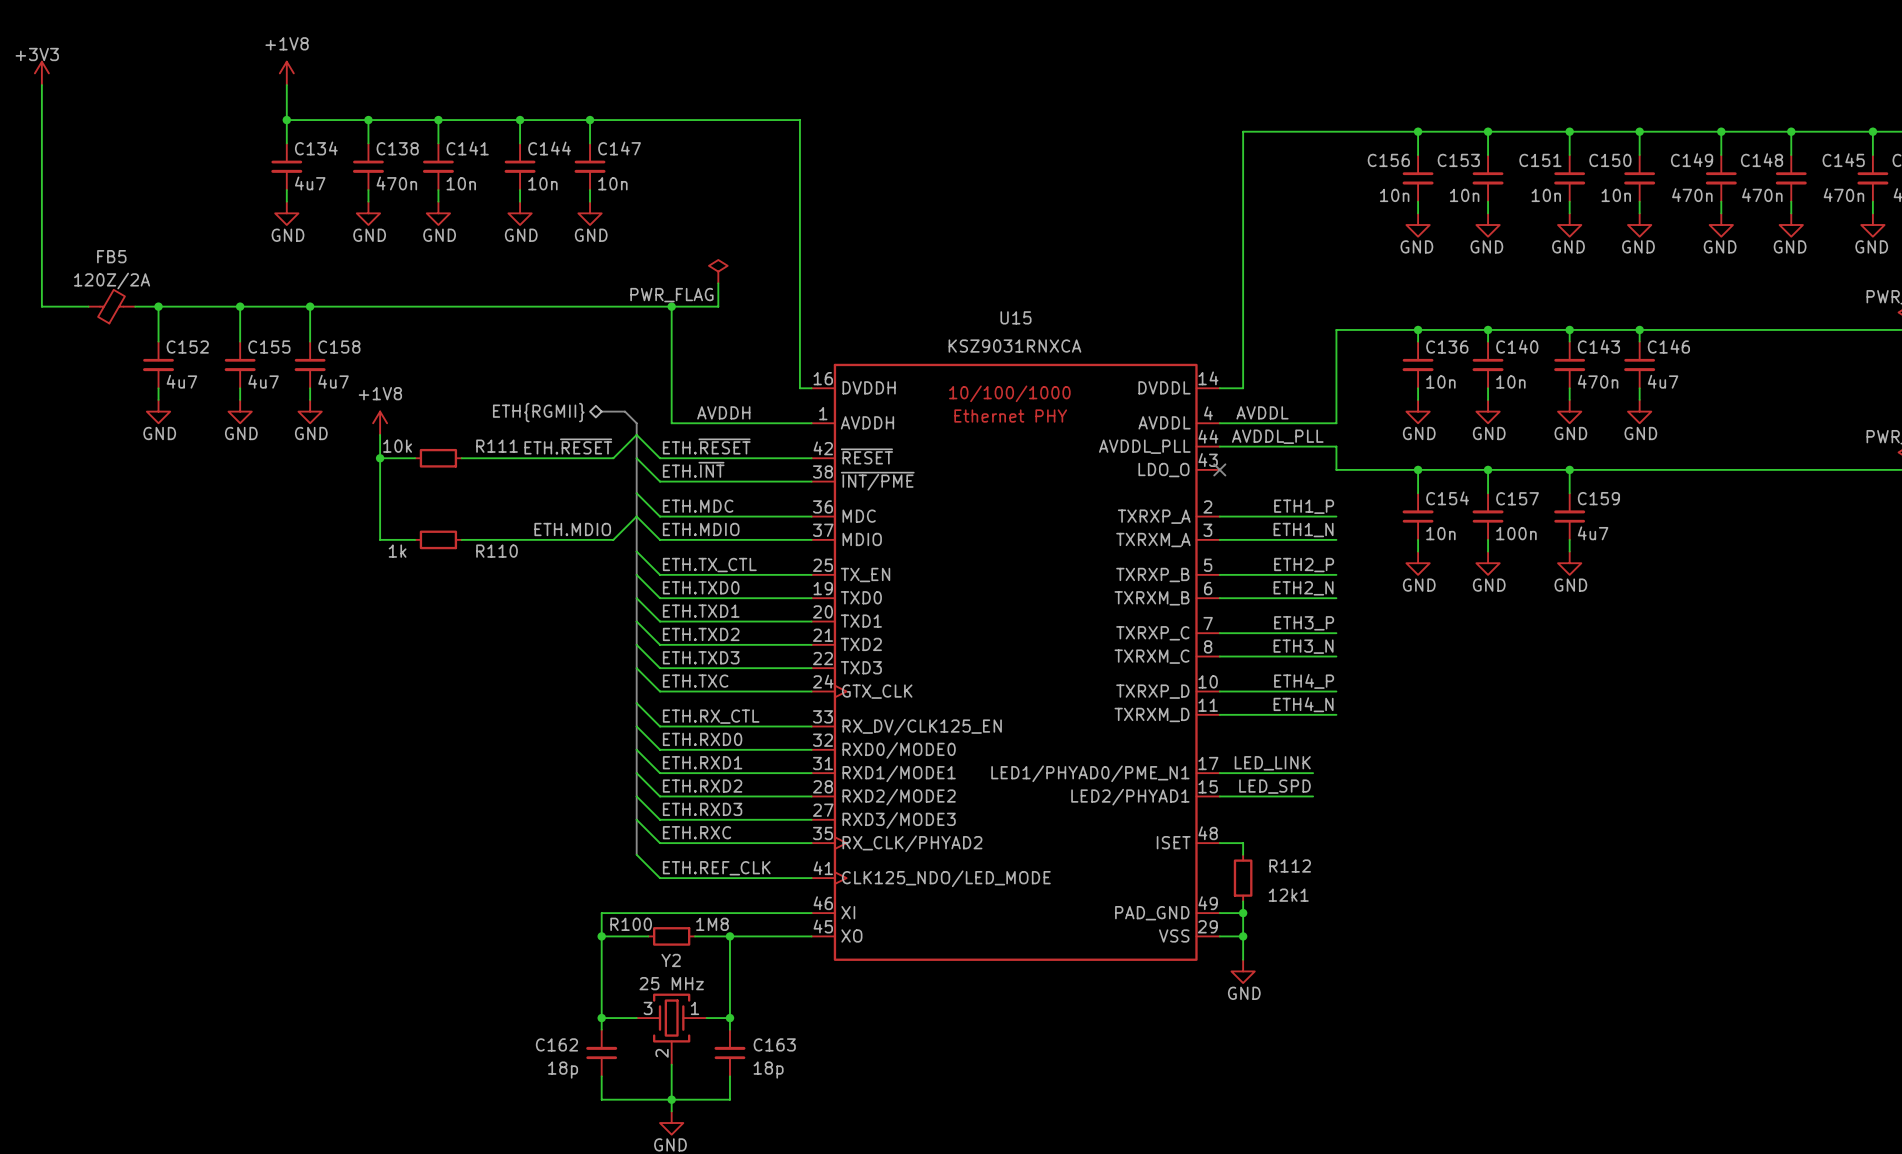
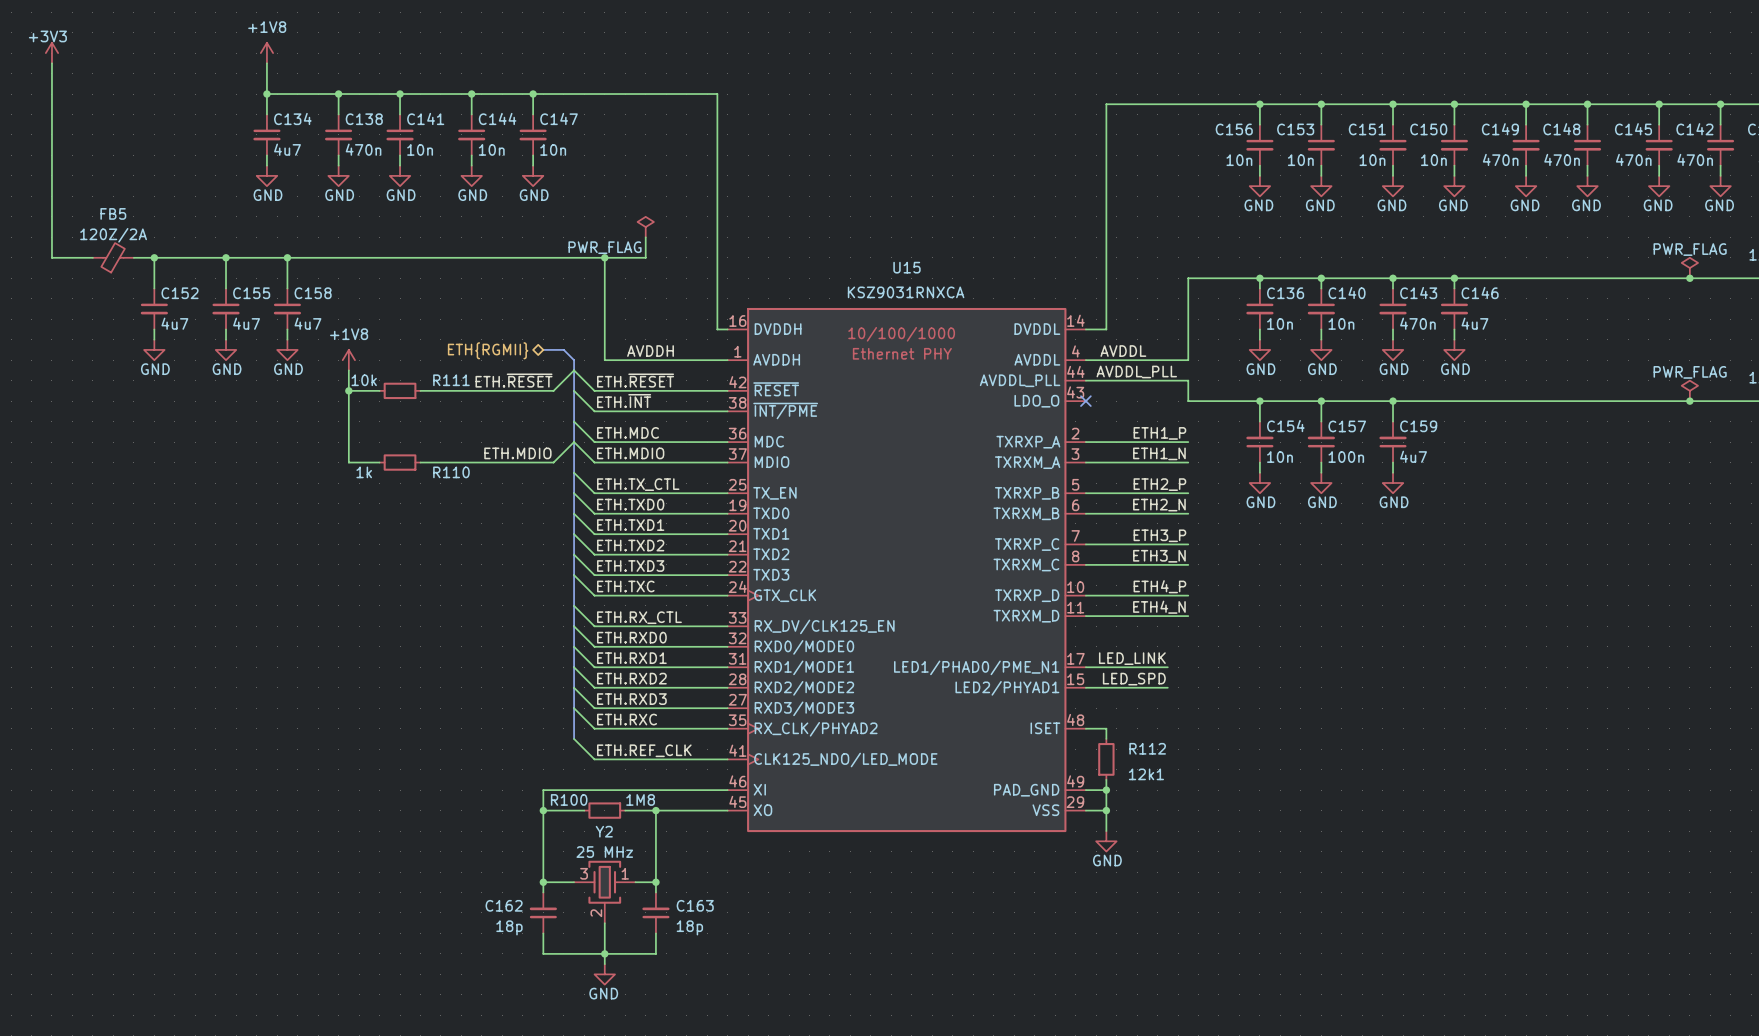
U15 pin name: LED1/PHYAD0/PME_N1 (1090, 773) -> LED1/PHAD0/PME_N1 (976, 667)

